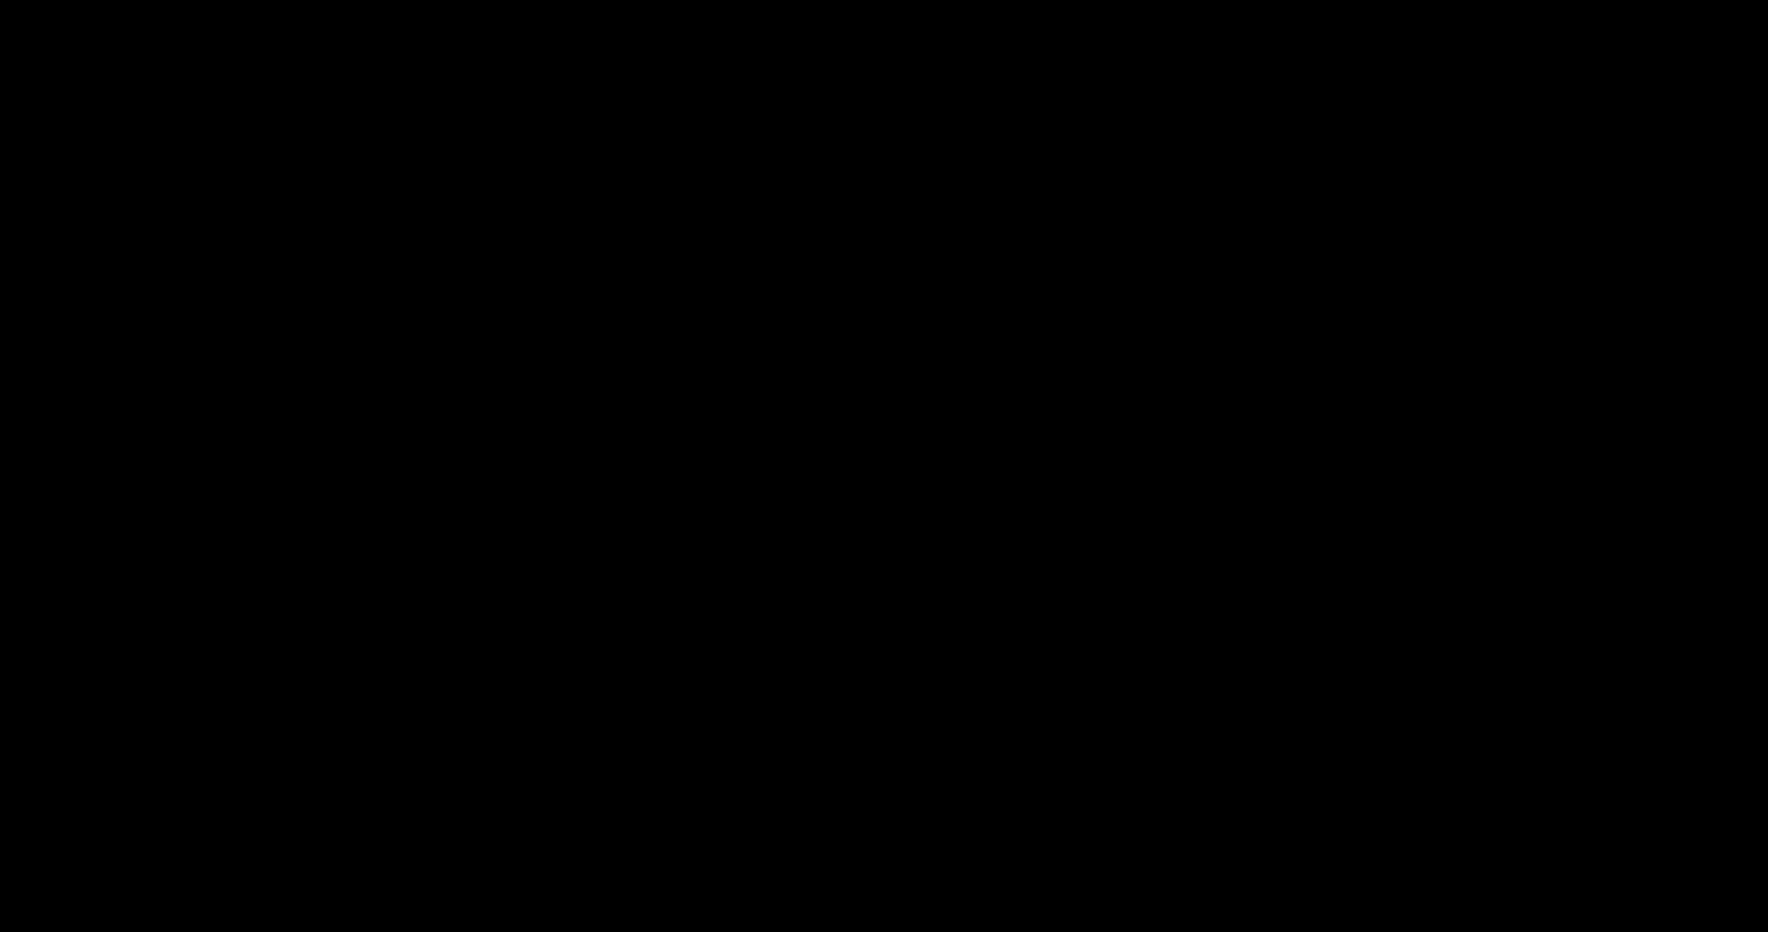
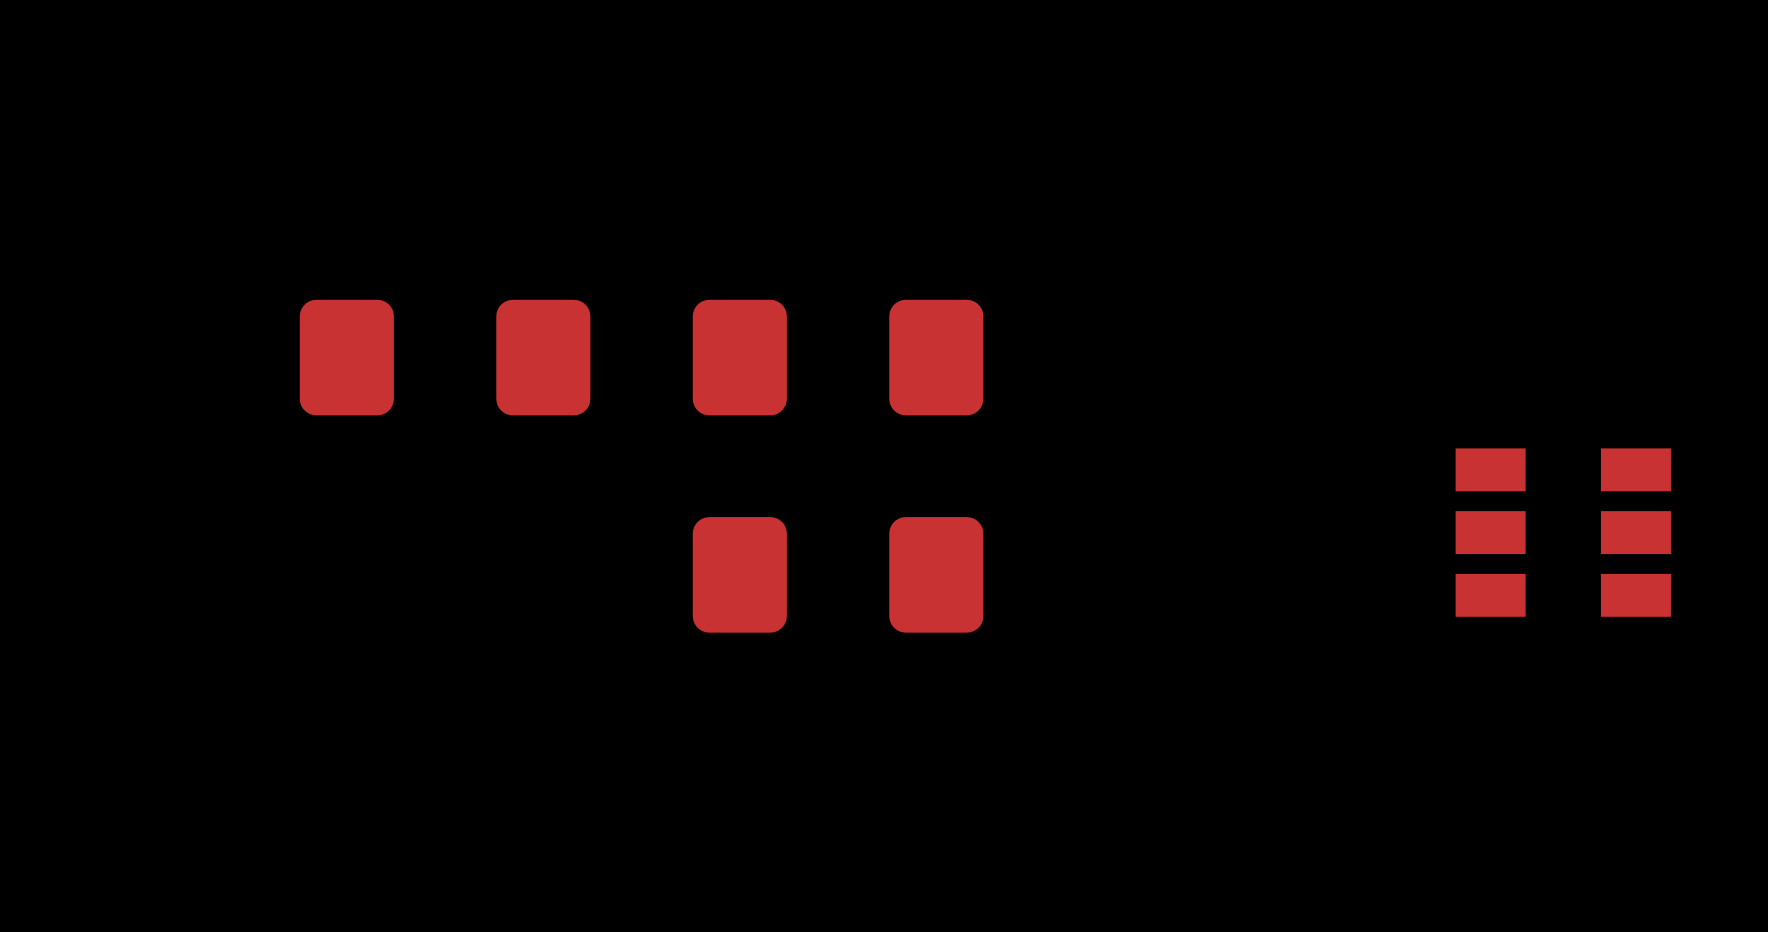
part: none -> (445, 357)
part: none -> (838, 357)
part: none -> (1563, 532)
part: none -> (838, 574)

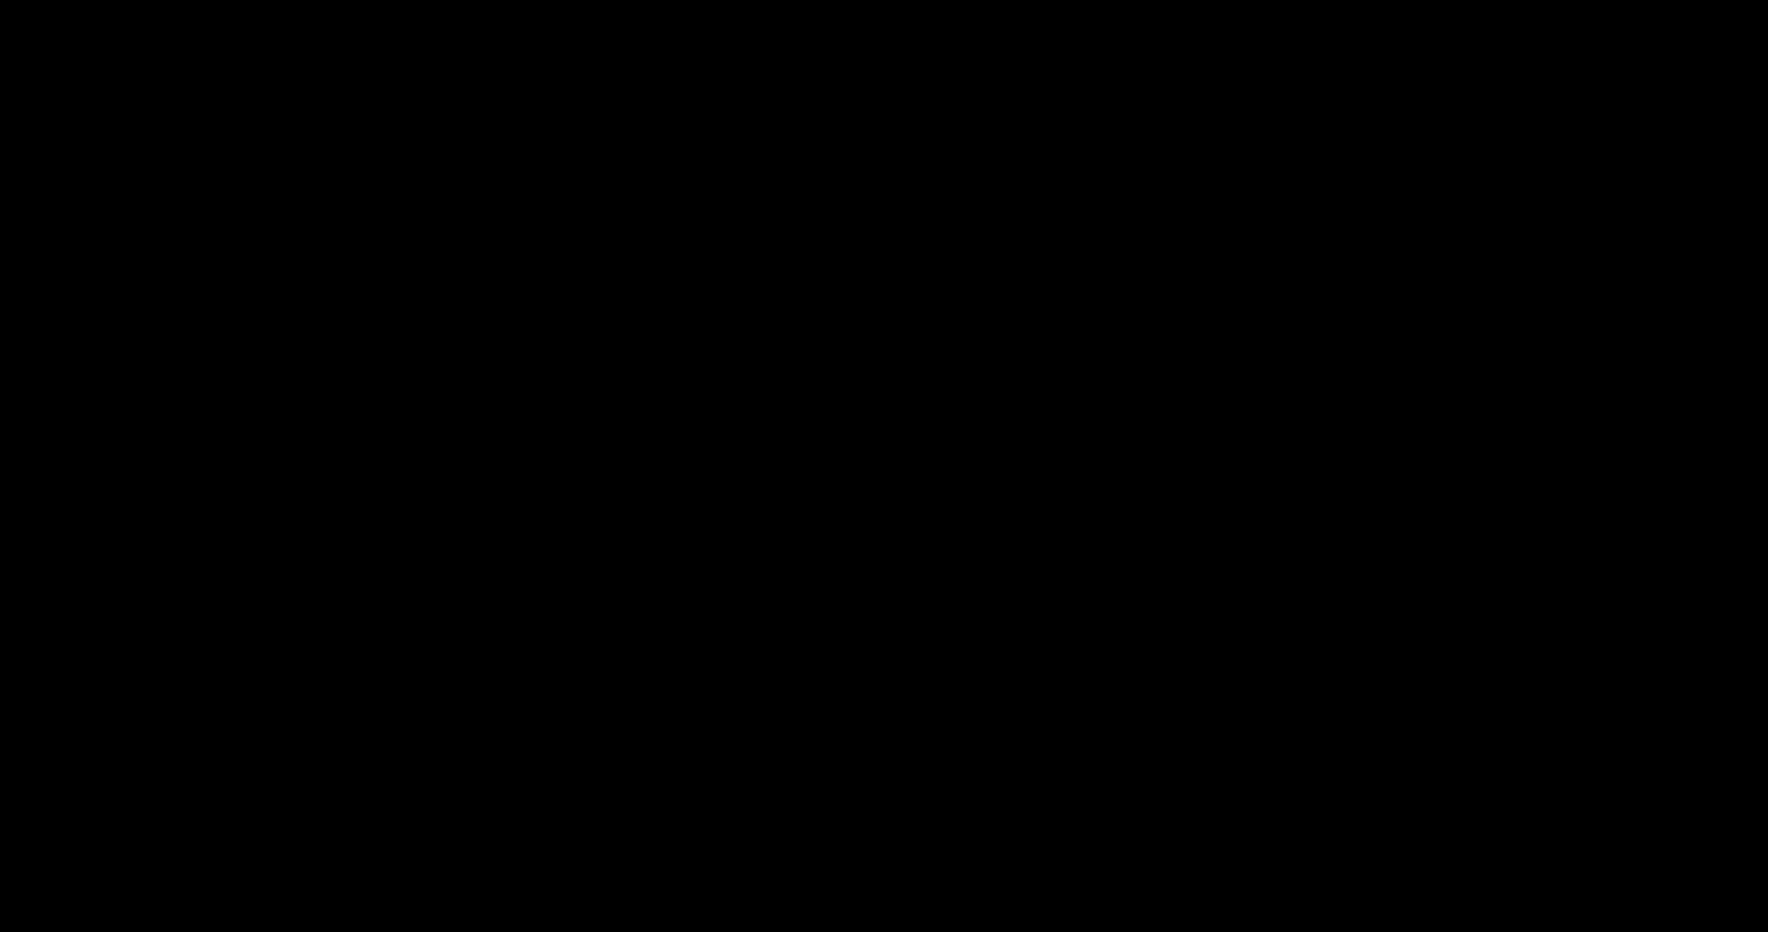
part: (445, 357) -> none
part: (838, 357) -> none
part: (1563, 532) -> none
part: (838, 574) -> none

